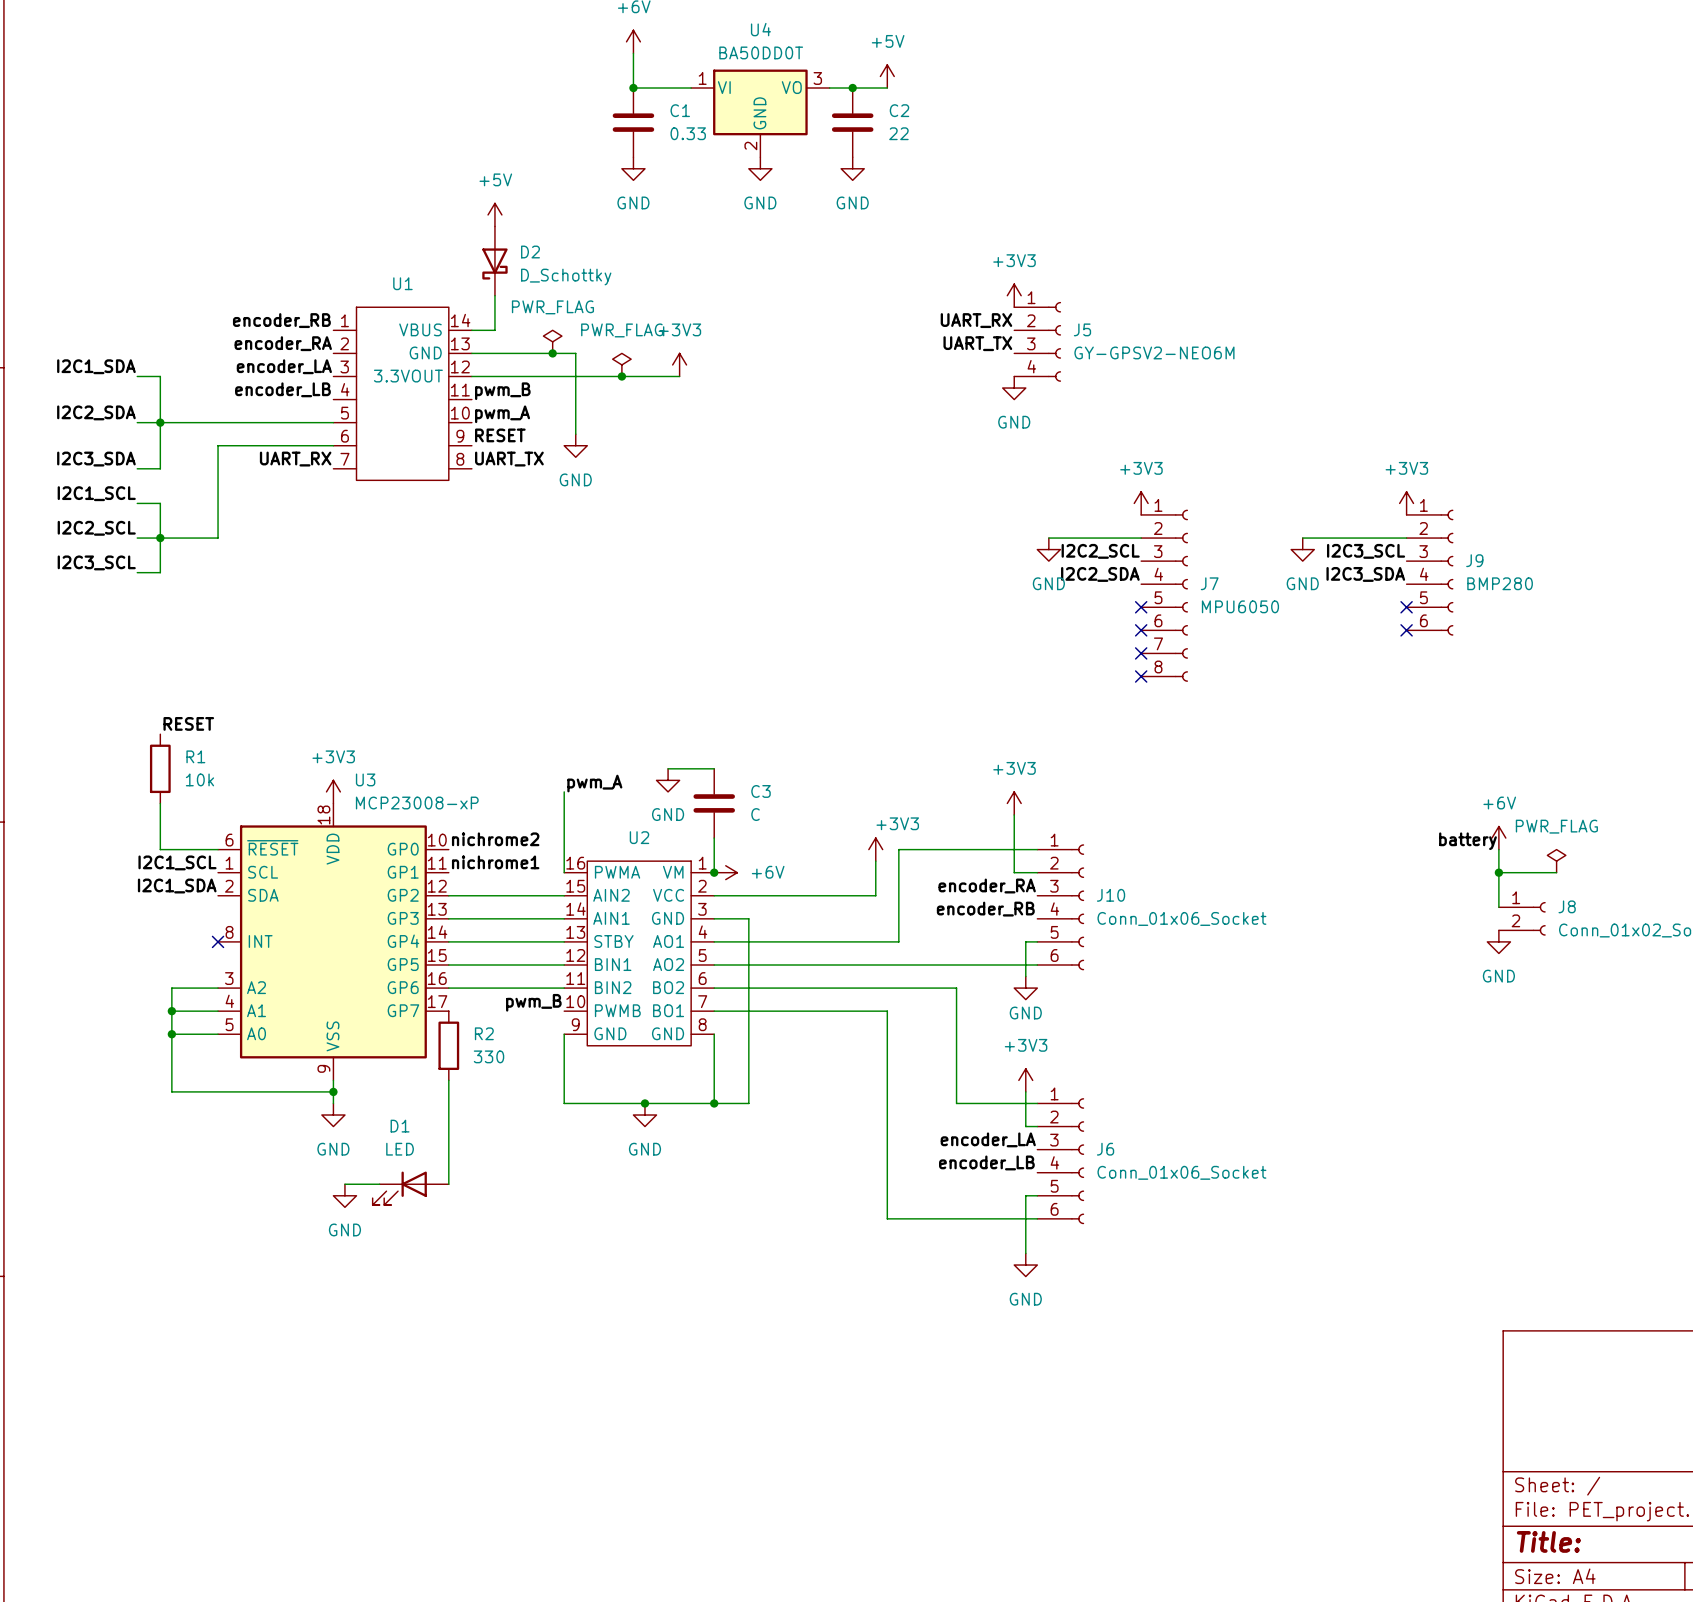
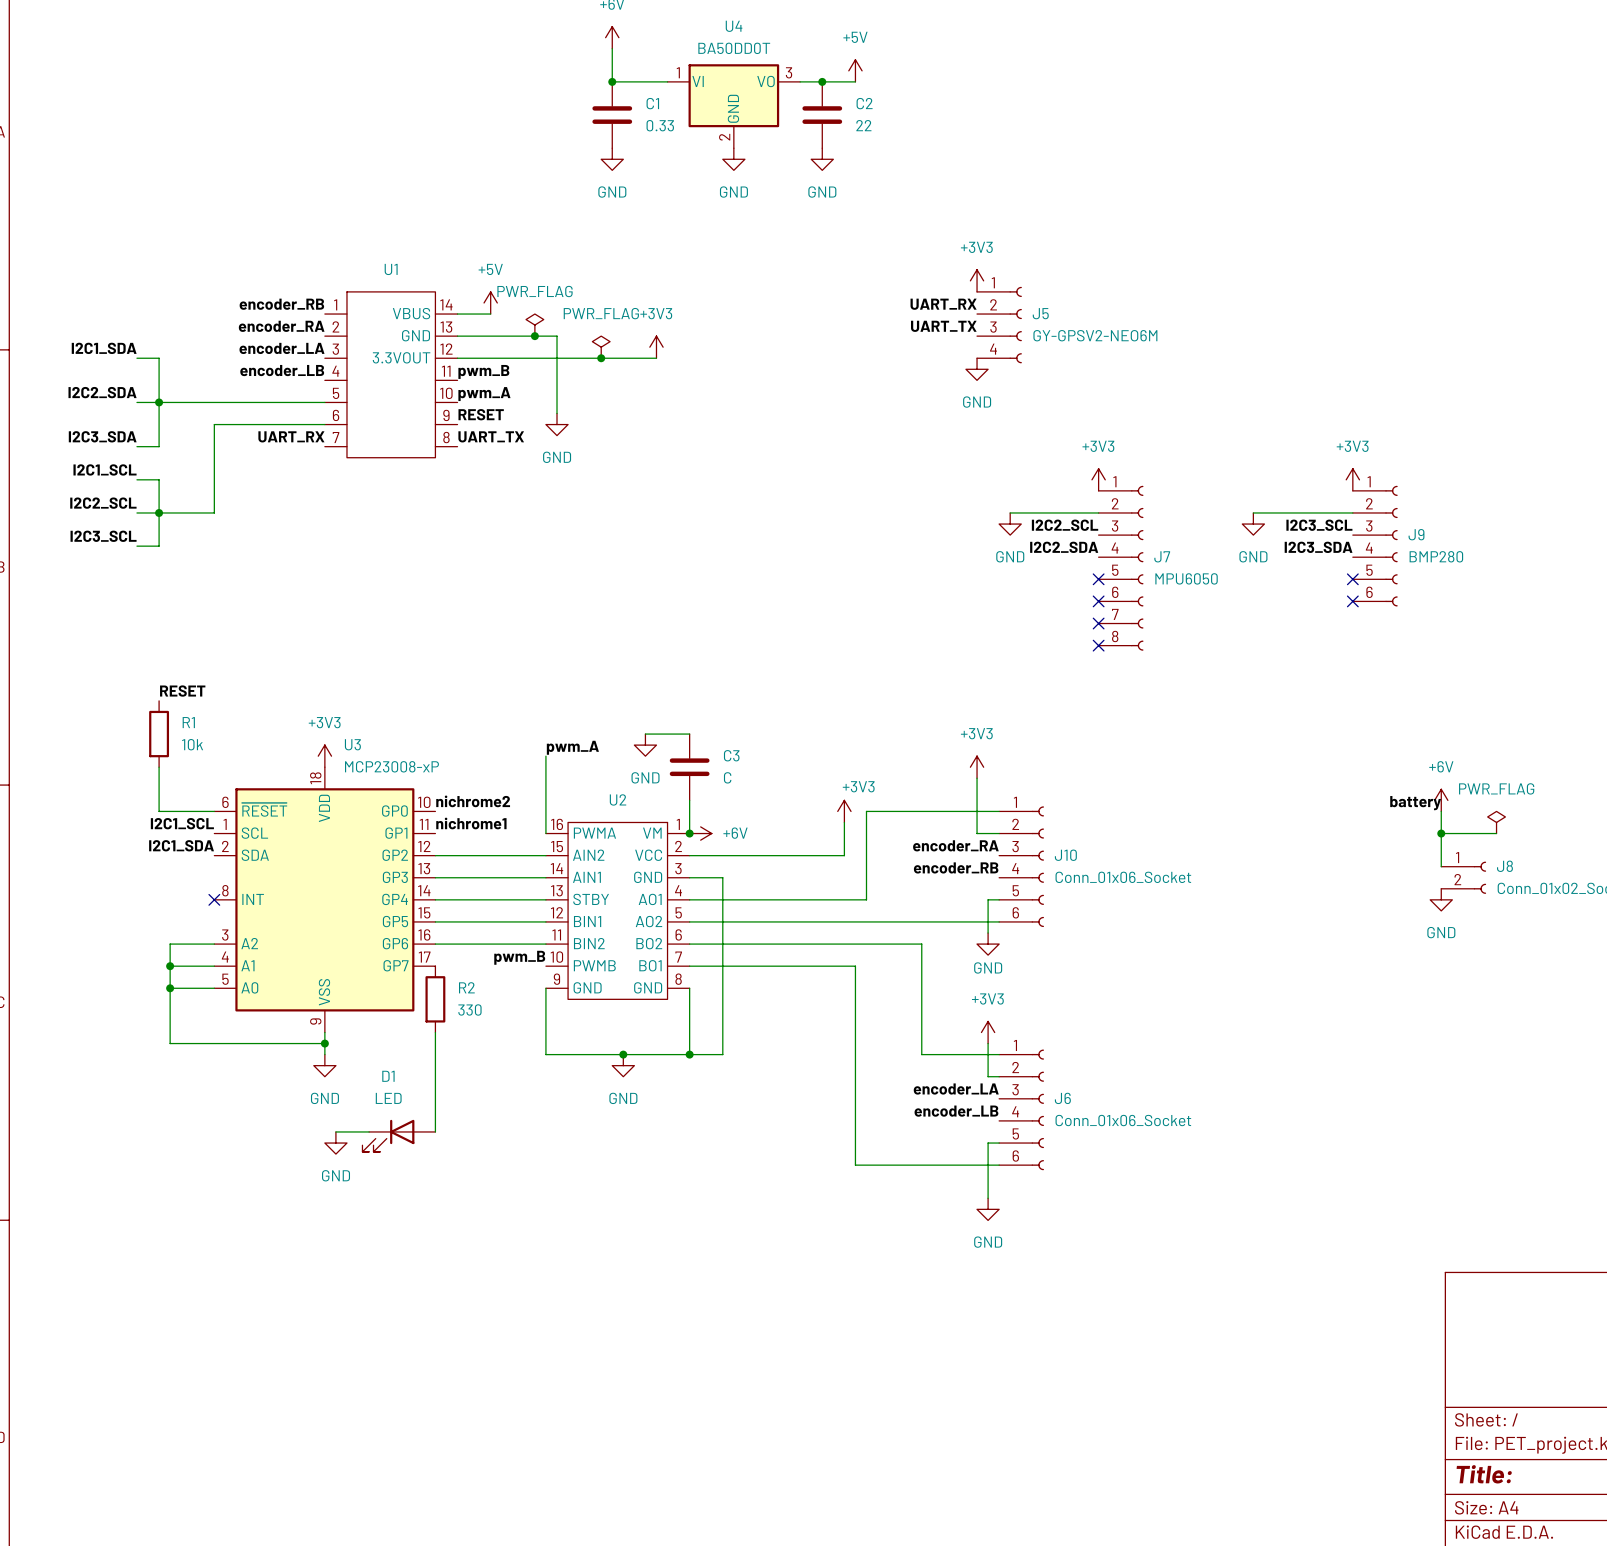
power symbol position: +5V (494, 214) -> +5V (490, 302)
D2: D_Schottky (494, 261) -> none
wire: (494, 295) (494, 330) -> (490, 314) (479, 314)

